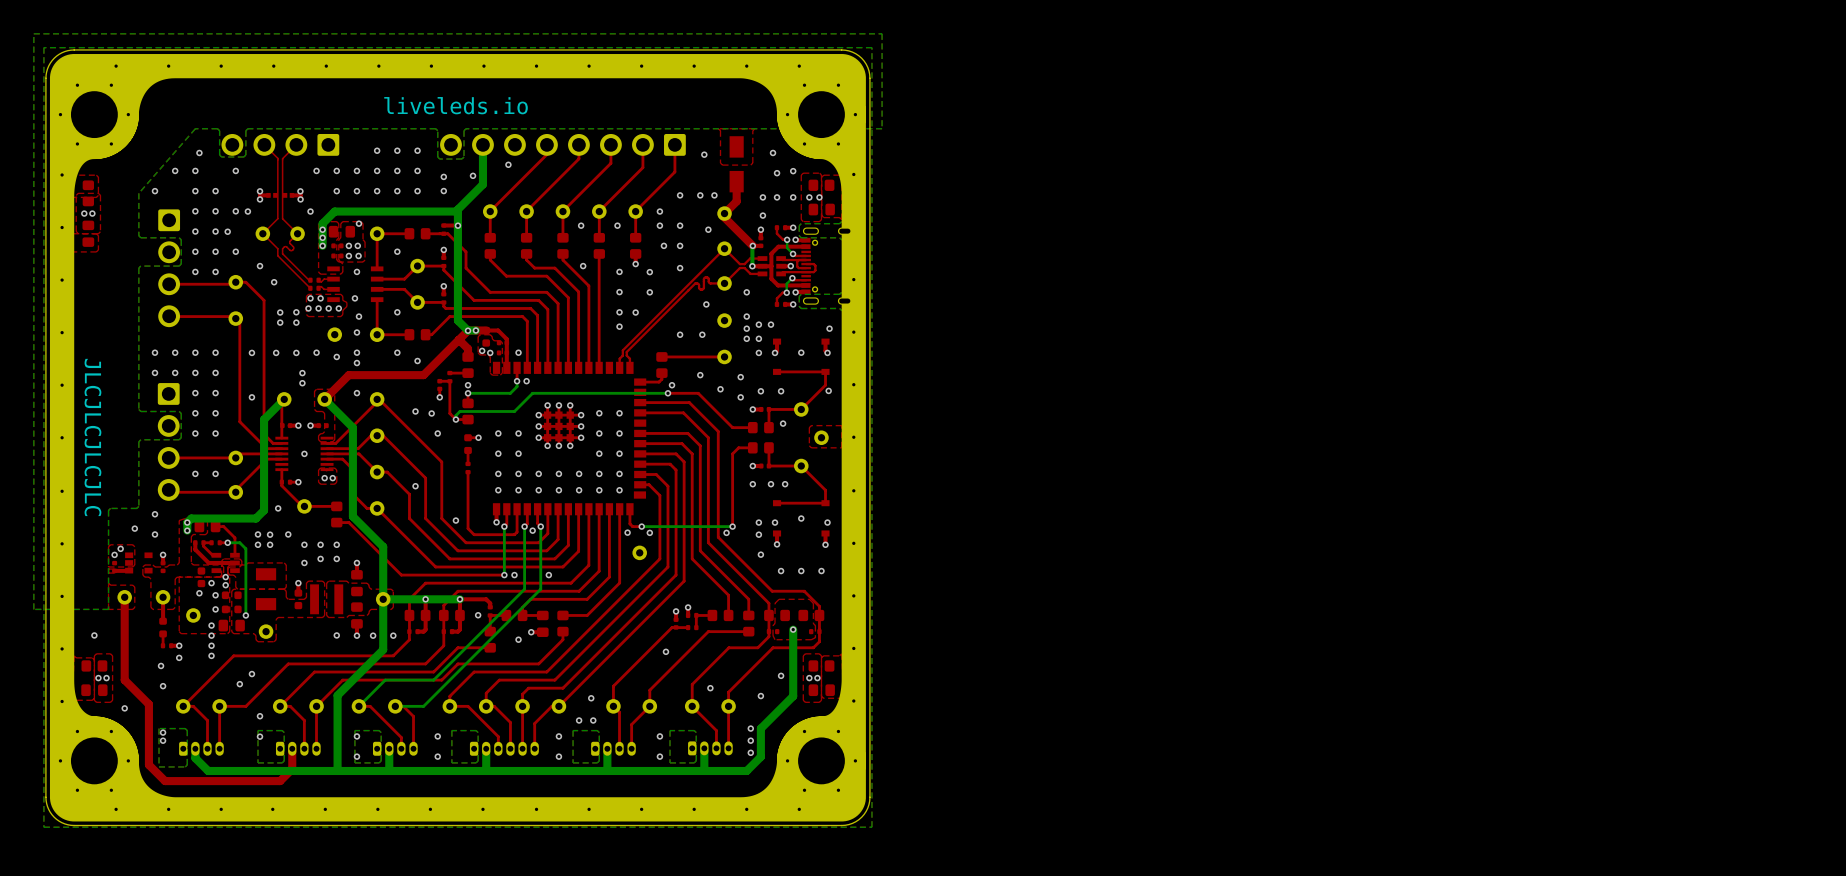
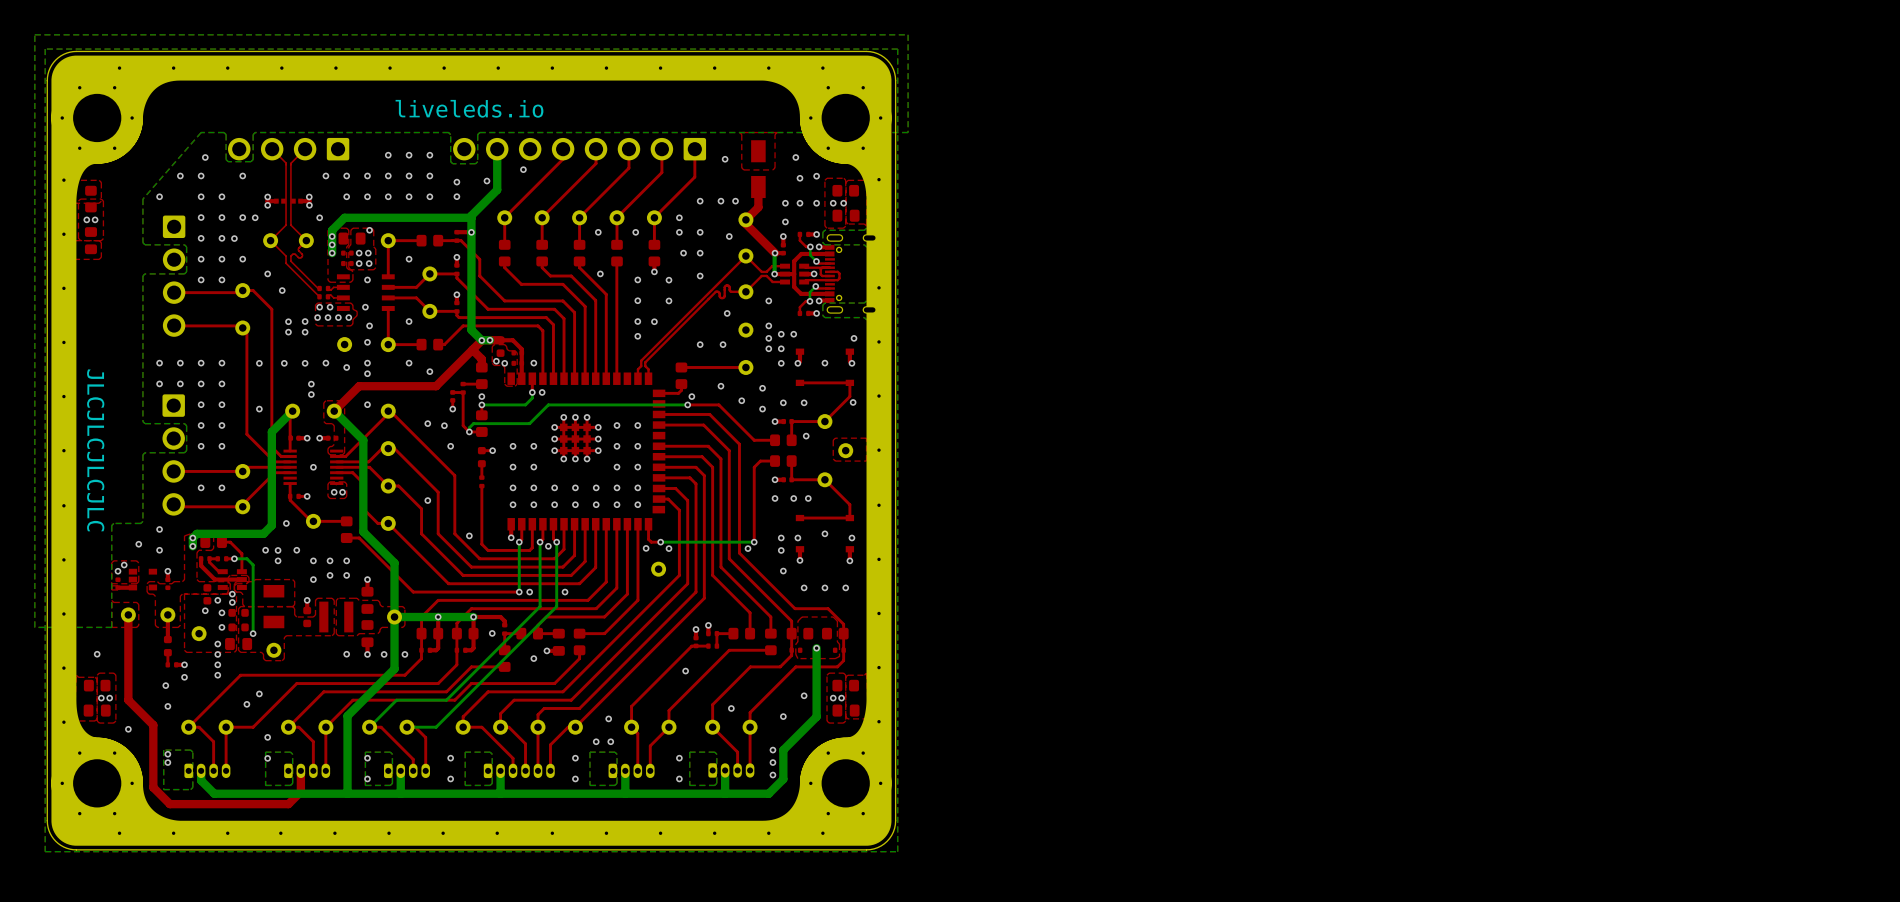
via: (257, 544) -> none

